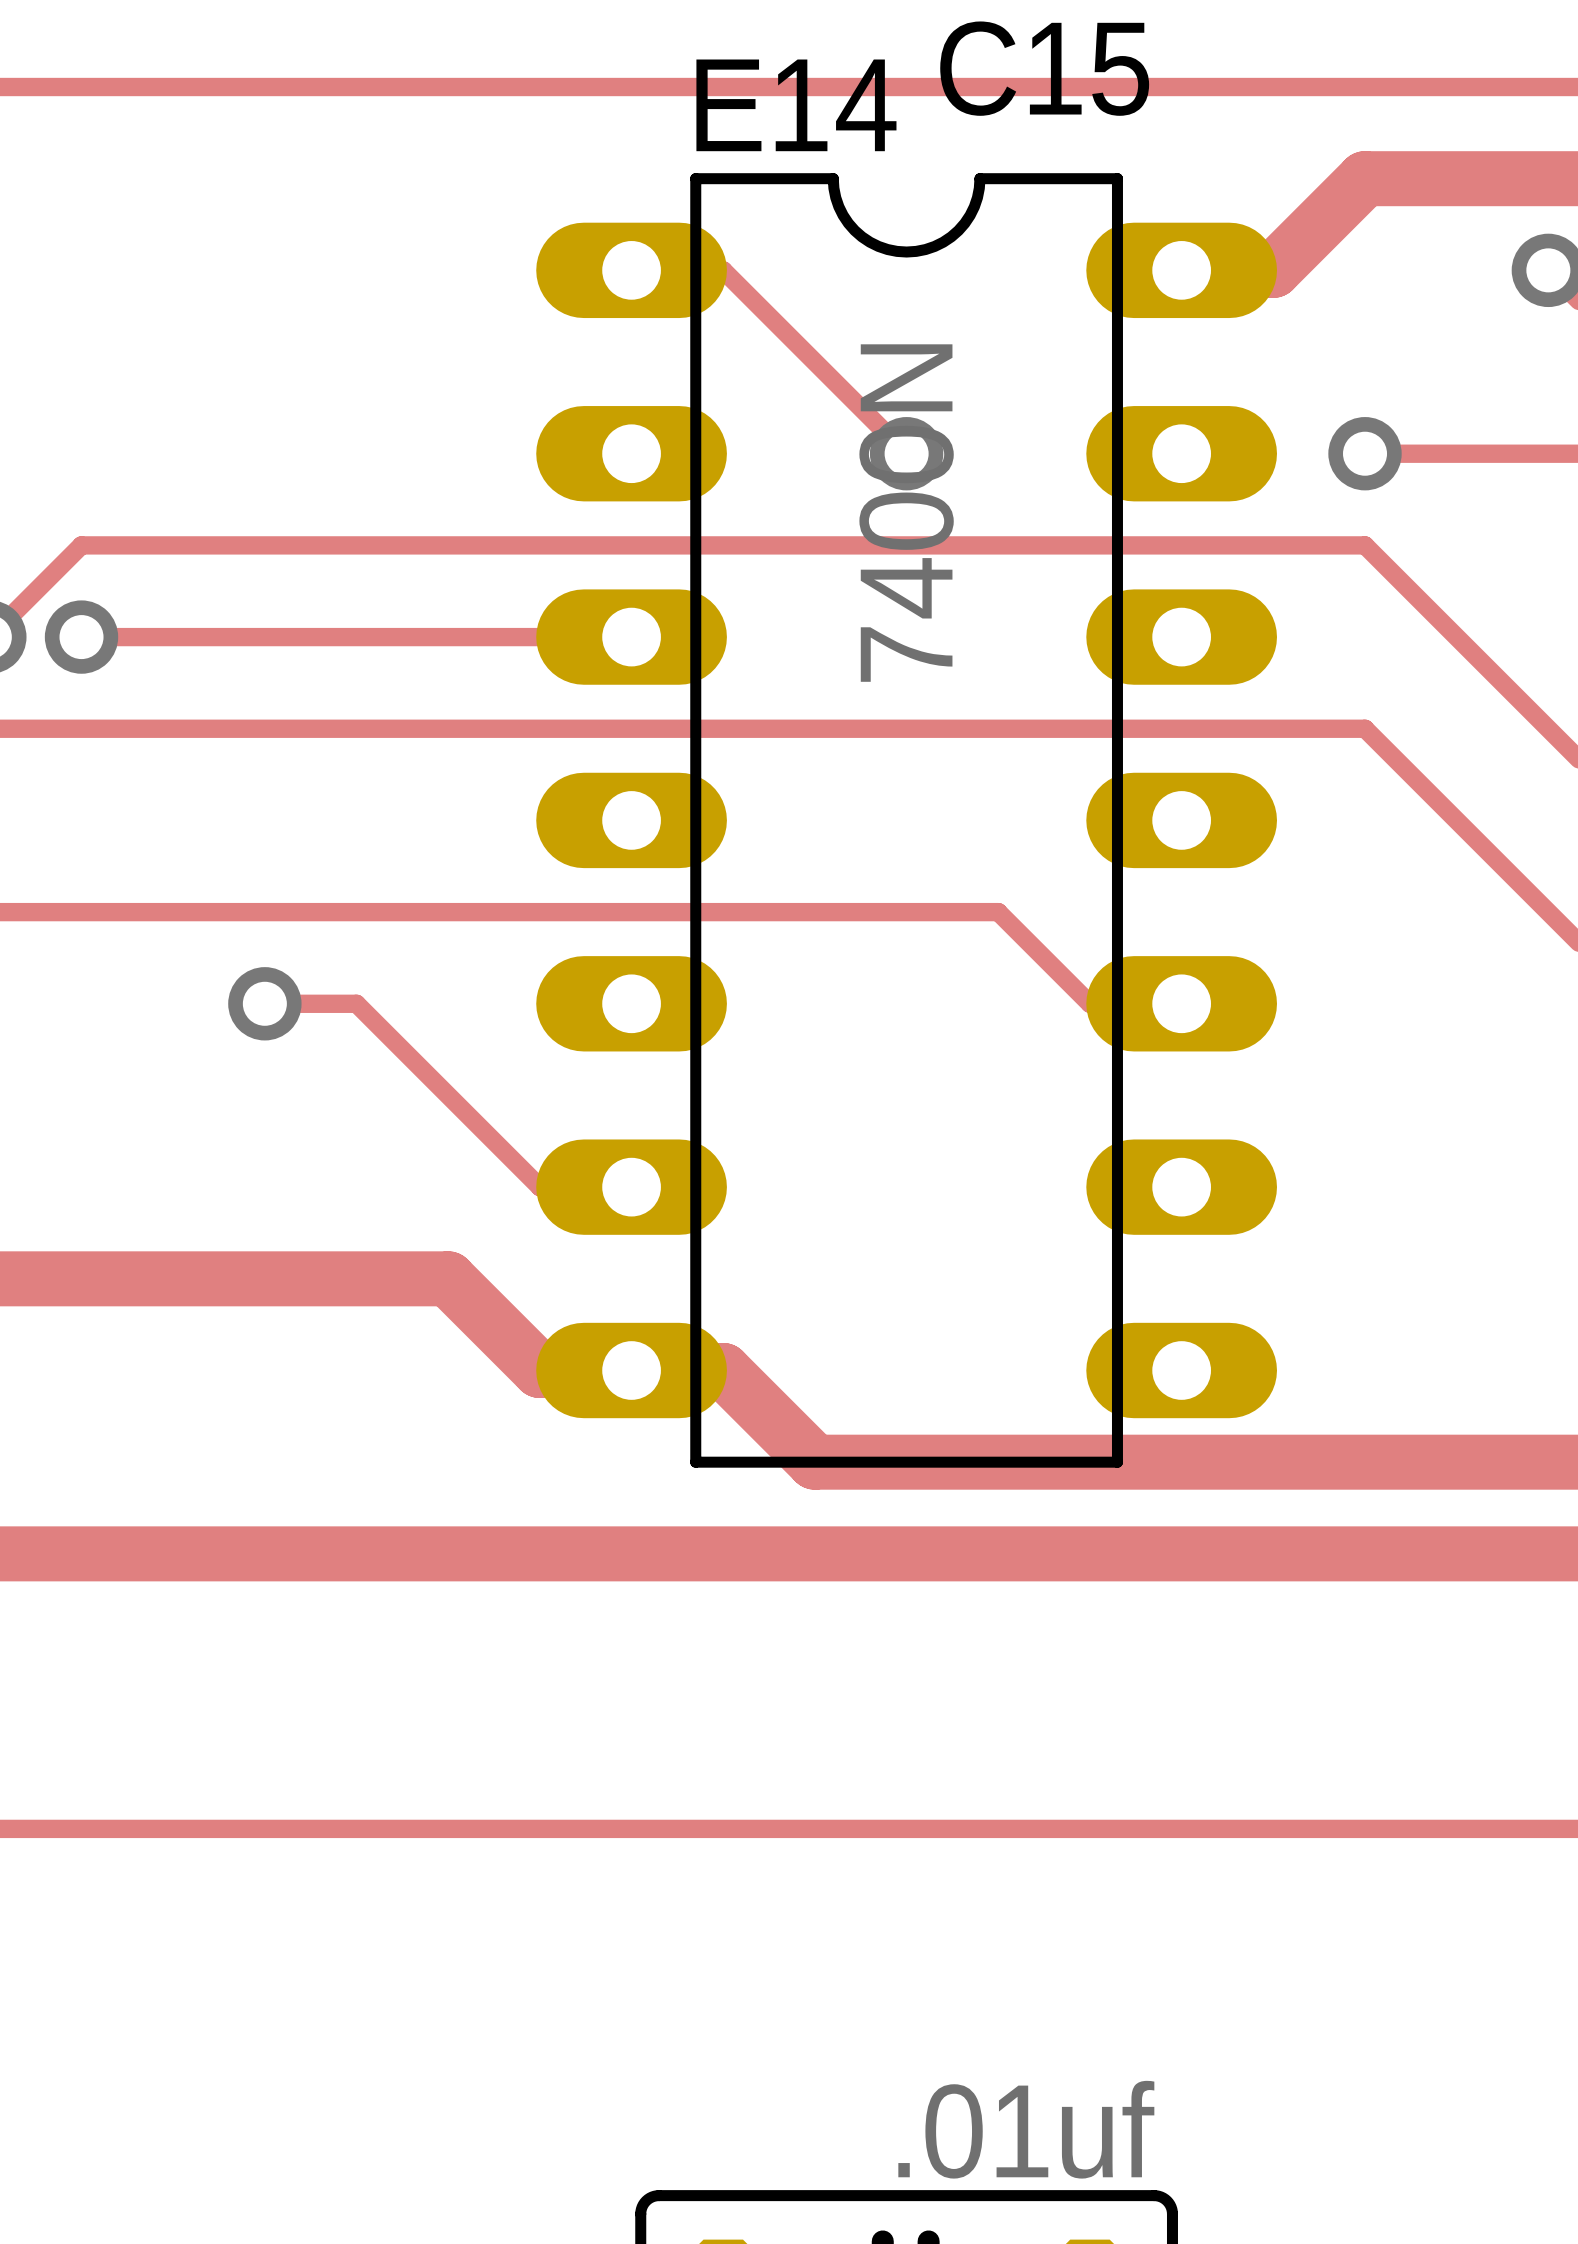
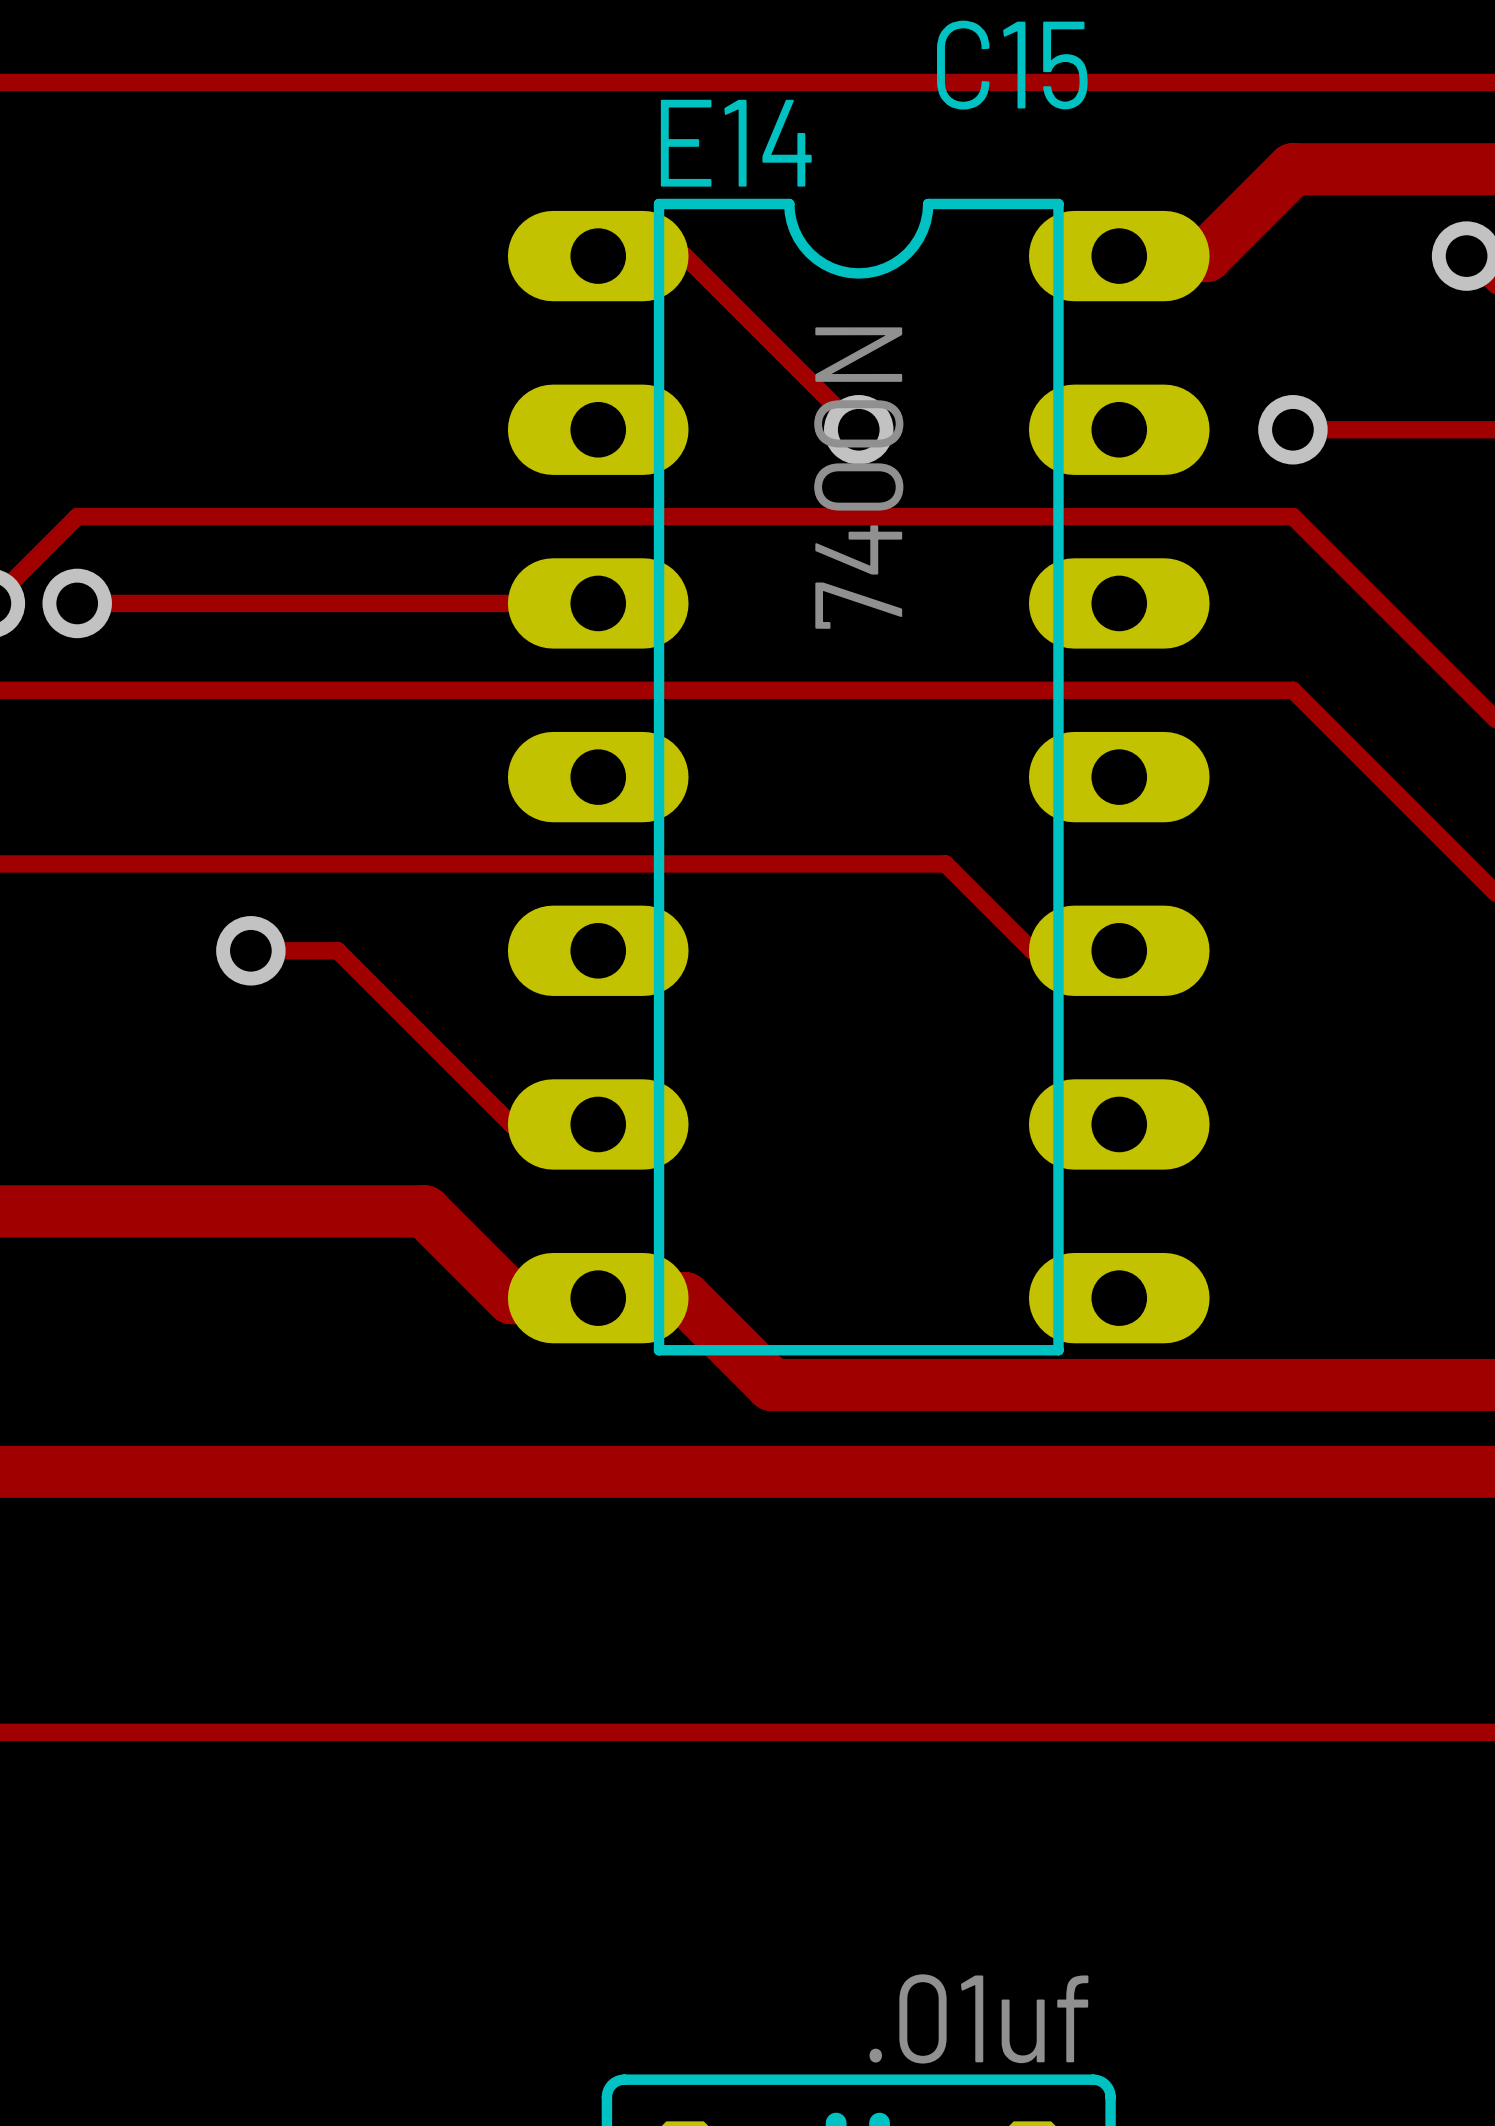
E14 name position: E14 (796, 105) -> E14 (736, 143)
E14 footprint: [536, 173, 1278, 1468] -> [507, 198, 1210, 1356]

